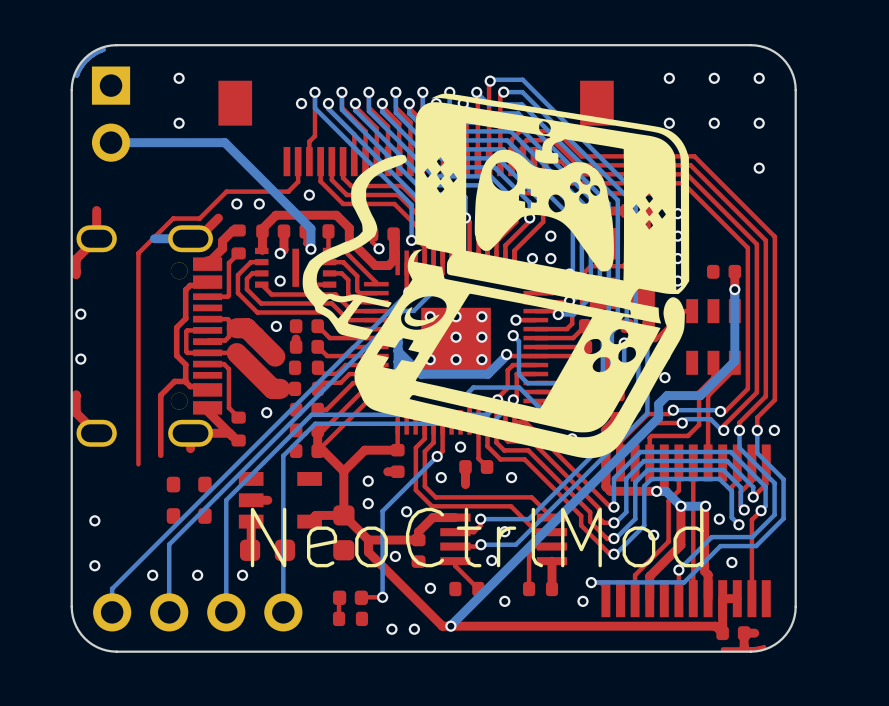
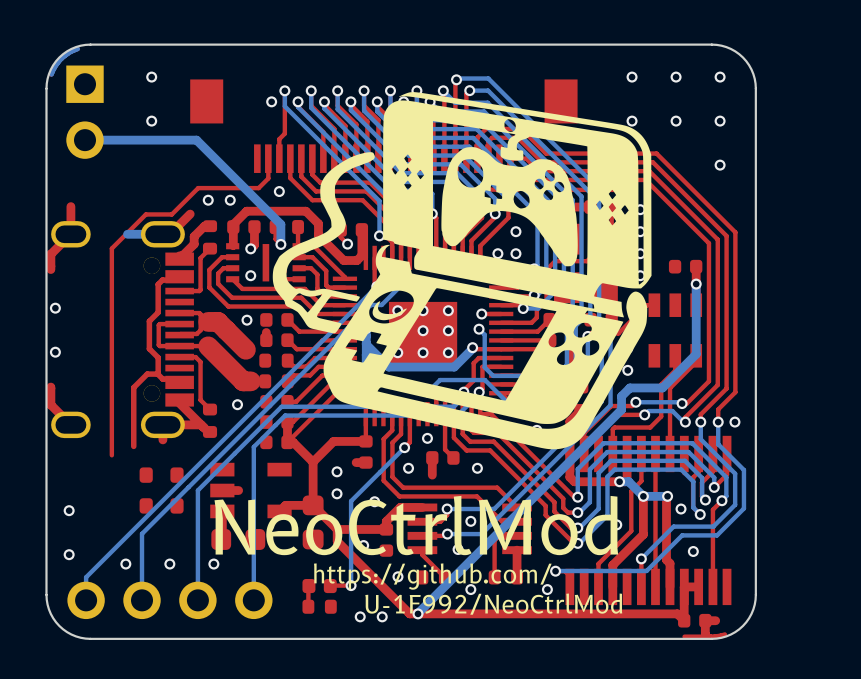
text: none -> https://github.com/ (432, 576)
text: none -> U-1F992/NeoCtrlMod (493, 604)

